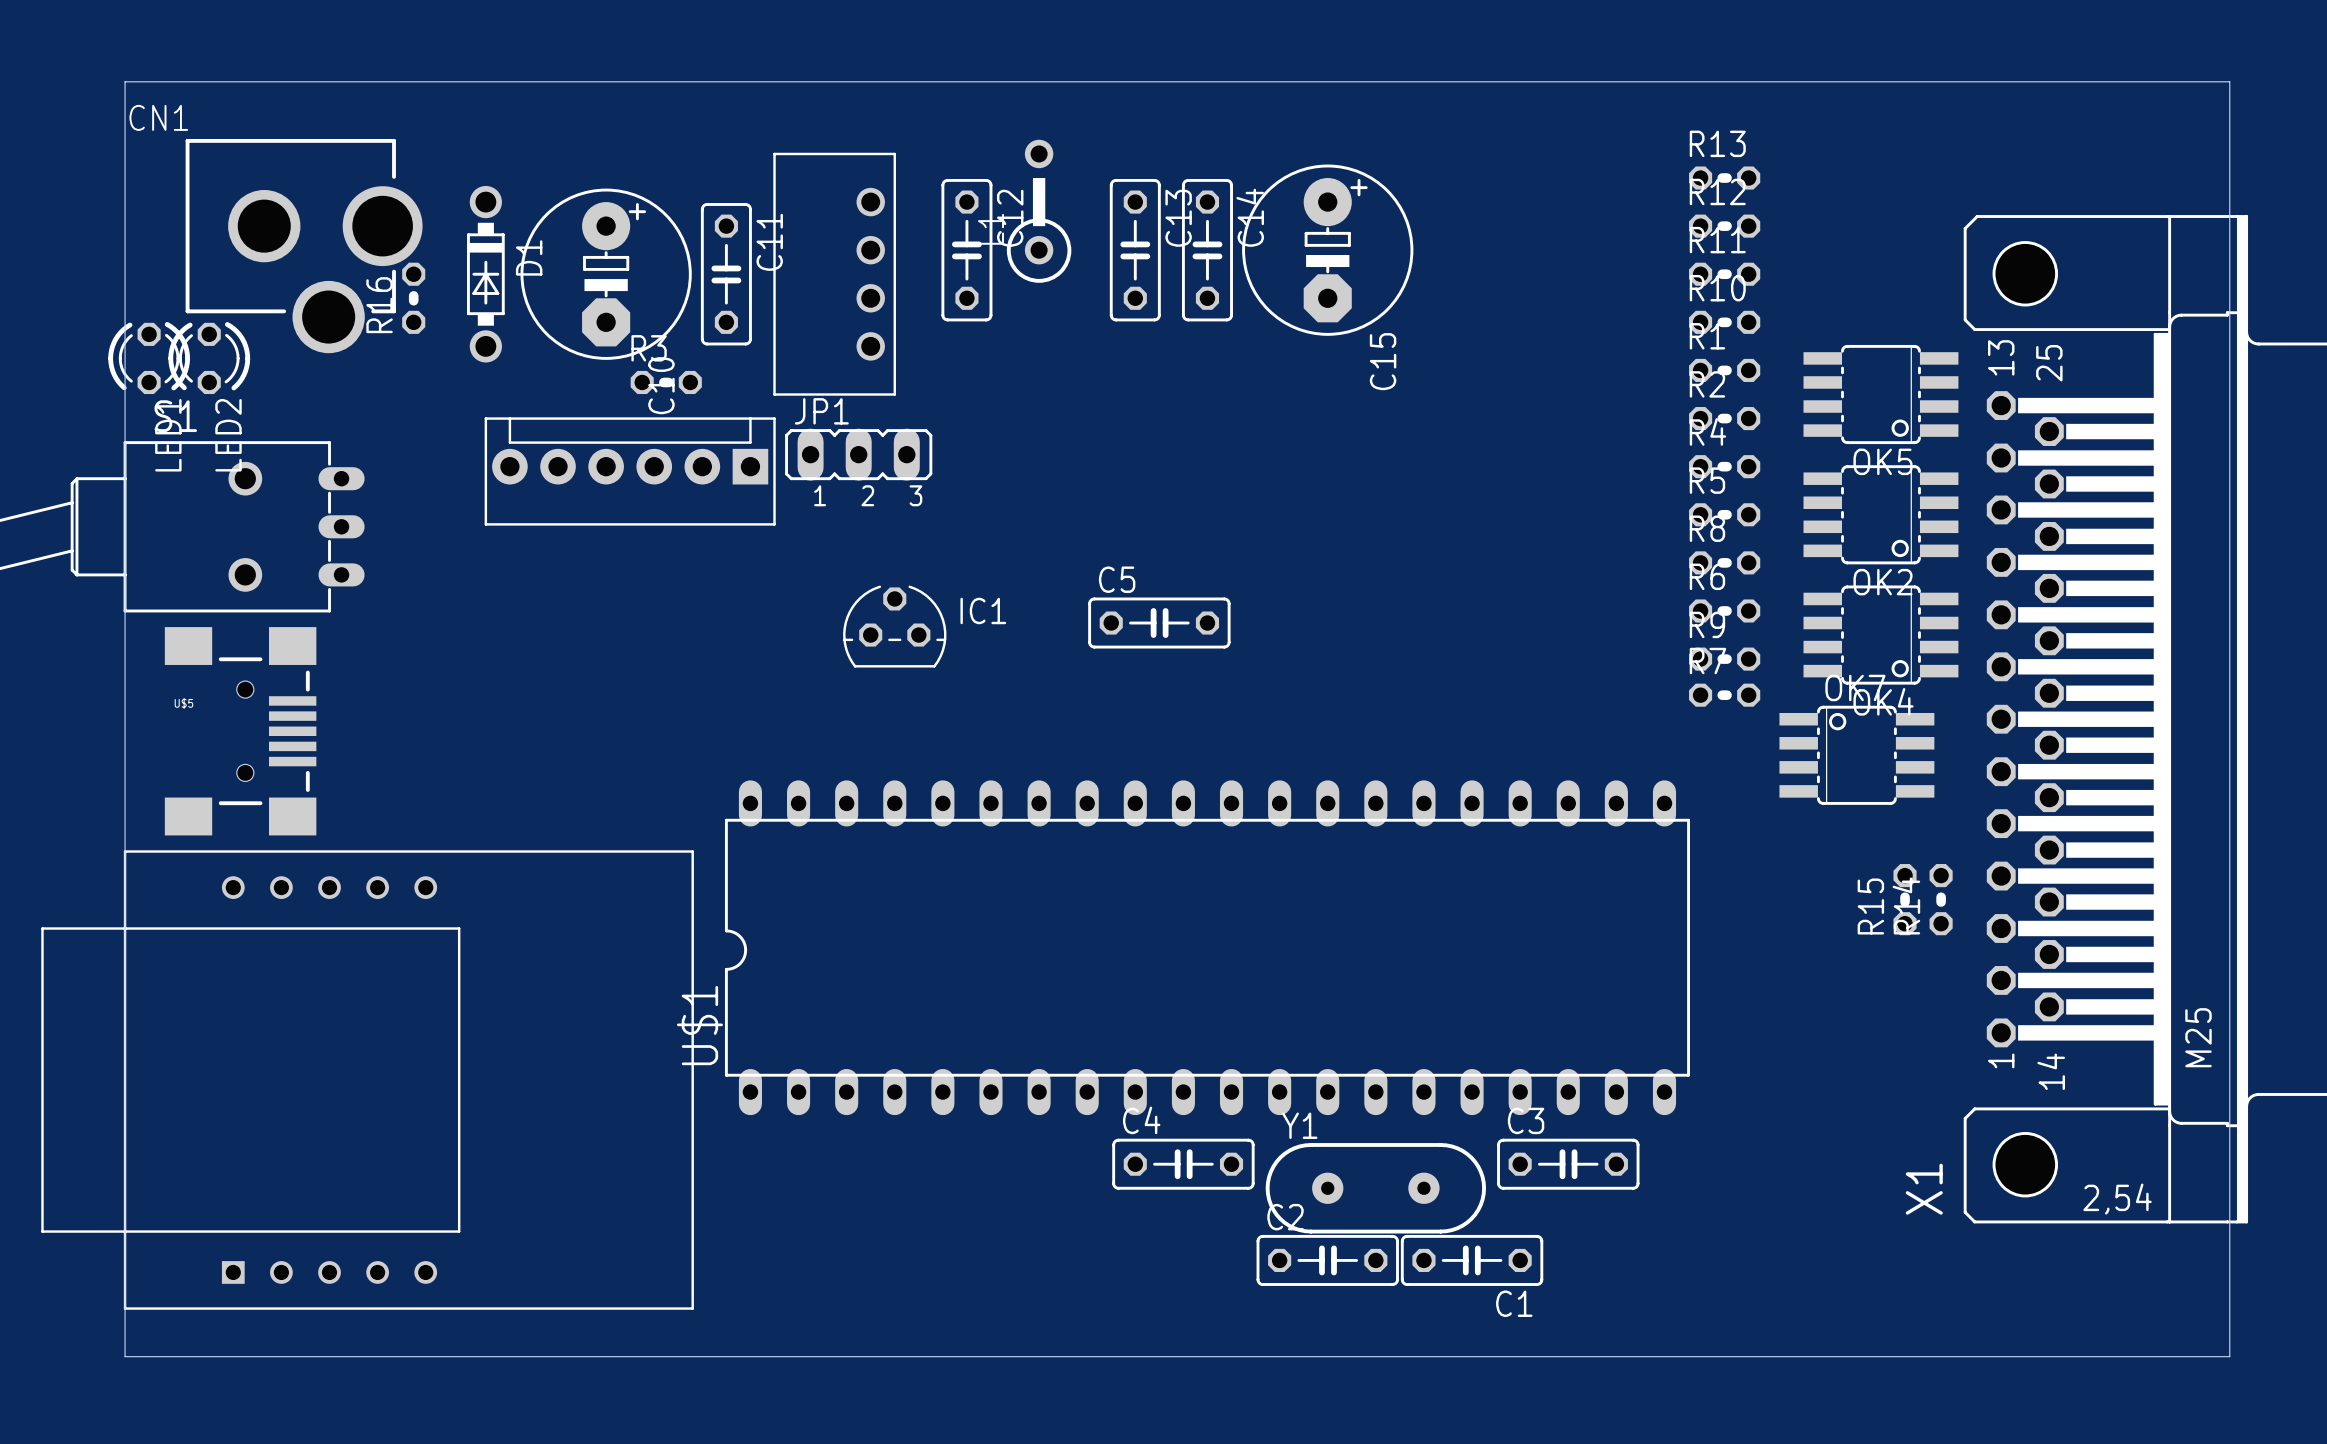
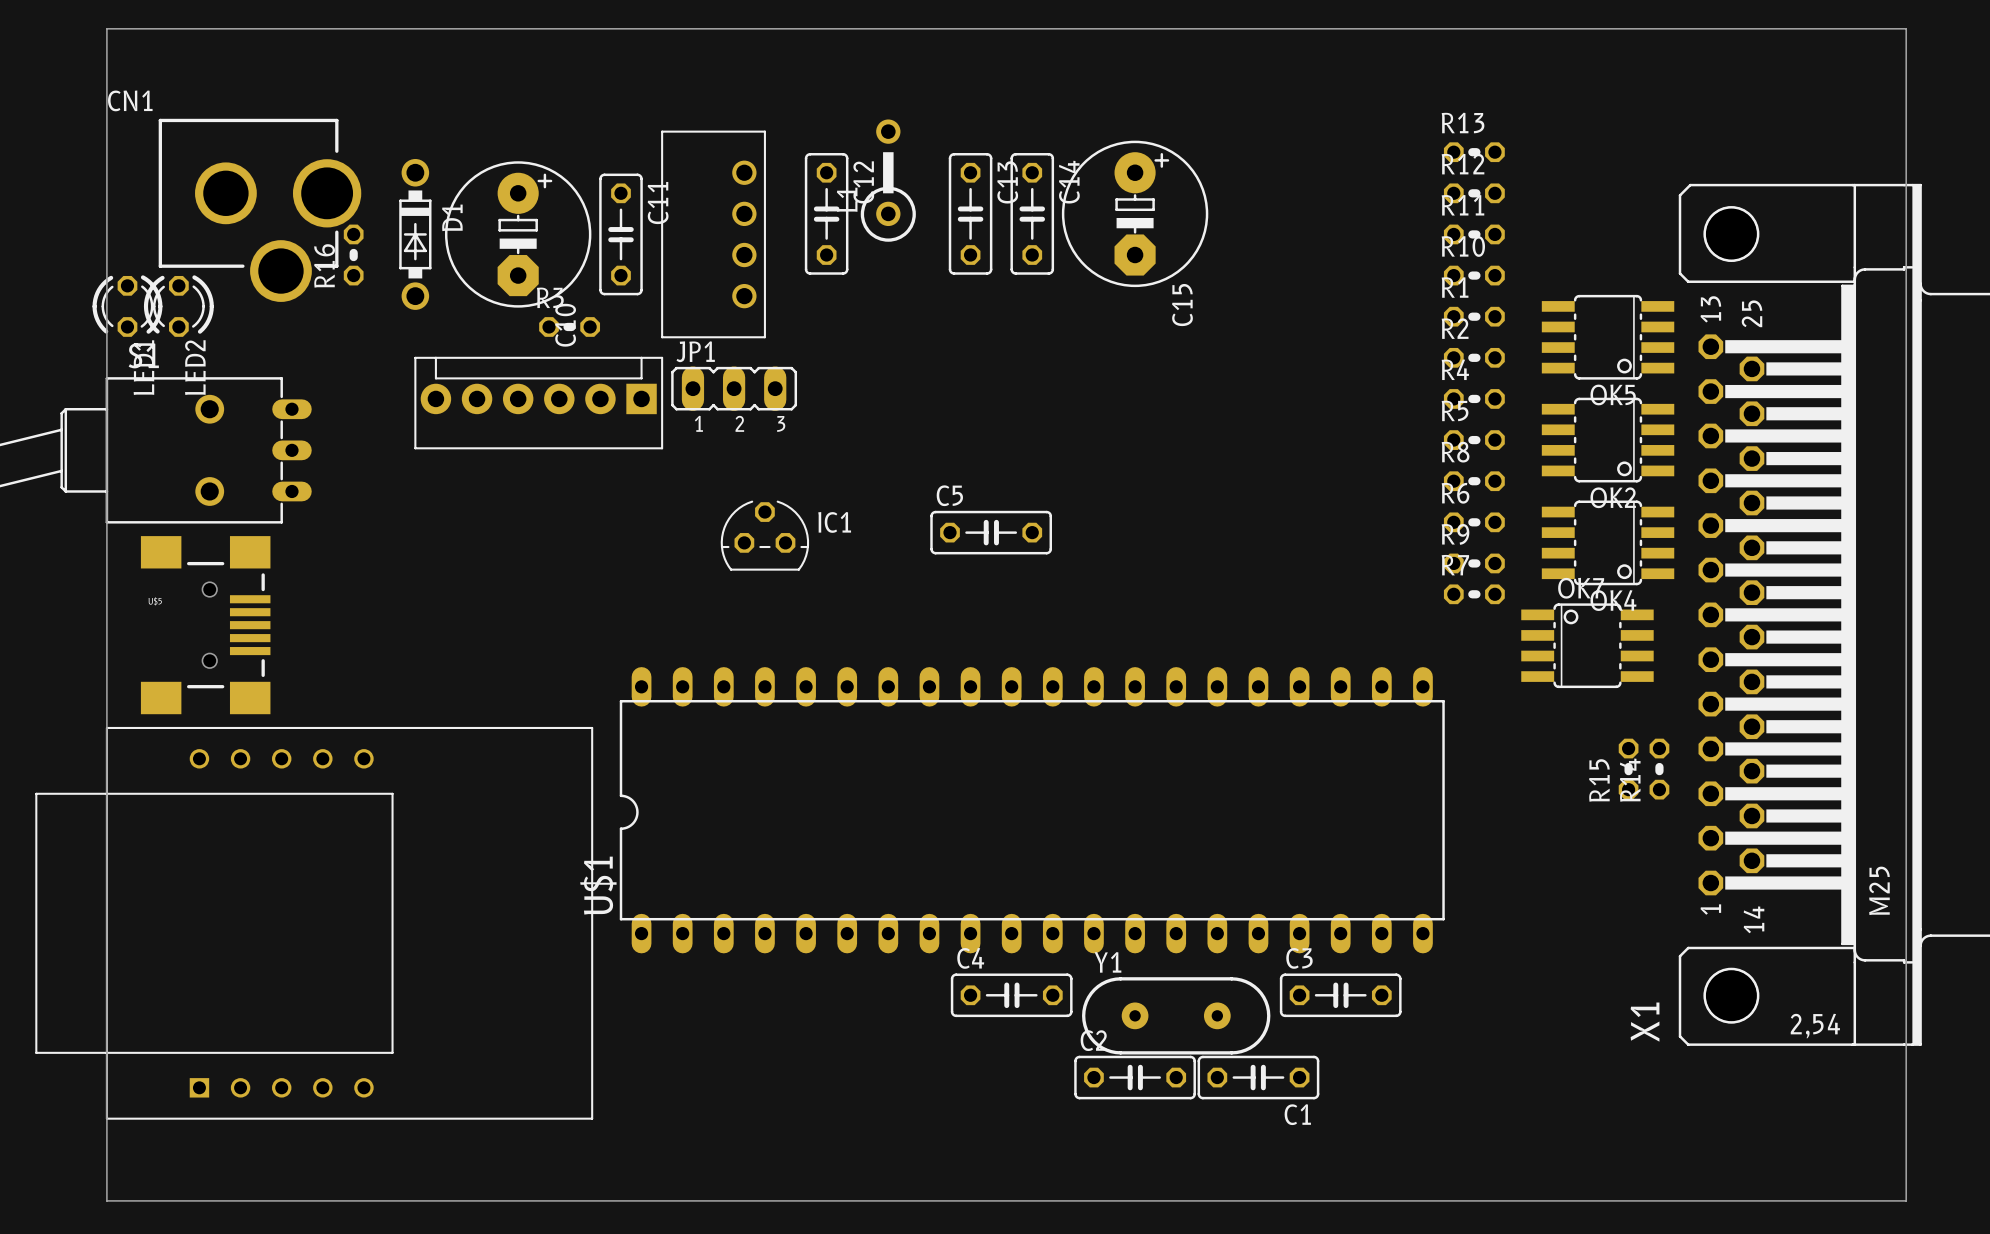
board edge: (125, 81) (2229, 81) -> (106, 69) (106, 28) (1906, 28) (1906, 69)
board edge: (125, 1356) (2229, 1356) -> (106, 1159) (106, 1200) (1906, 1200) (1906, 1159)

